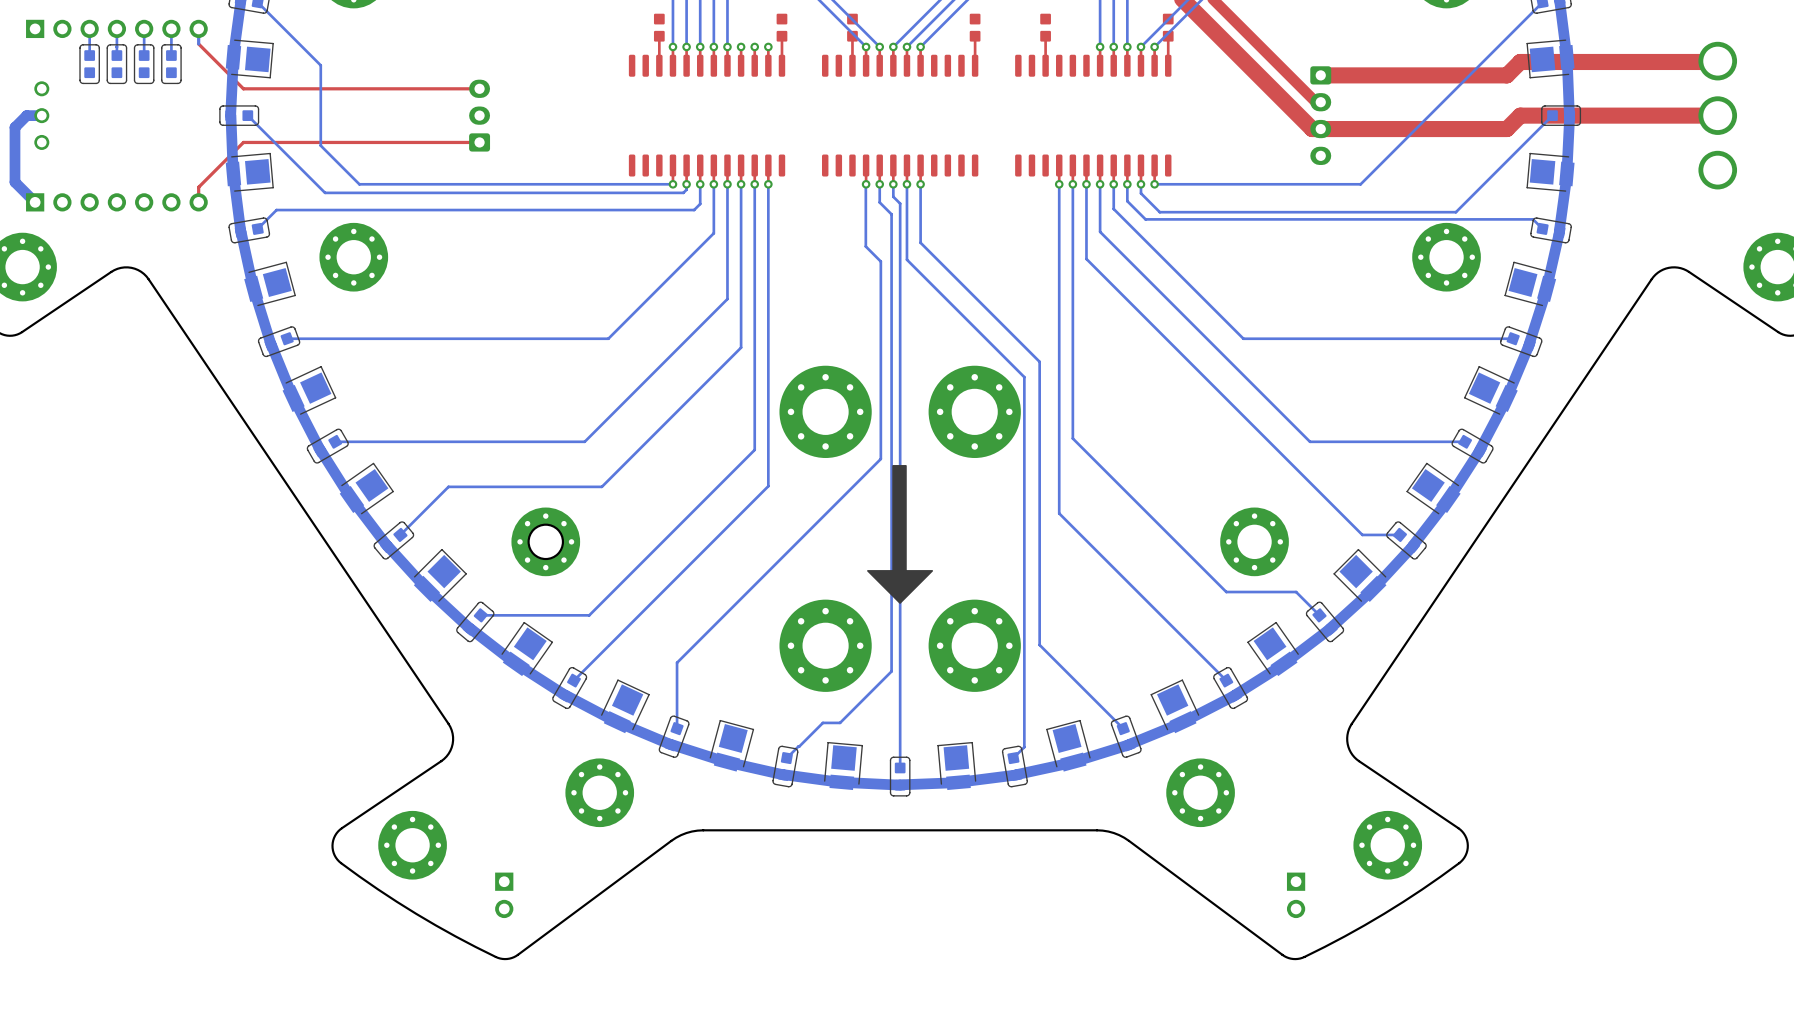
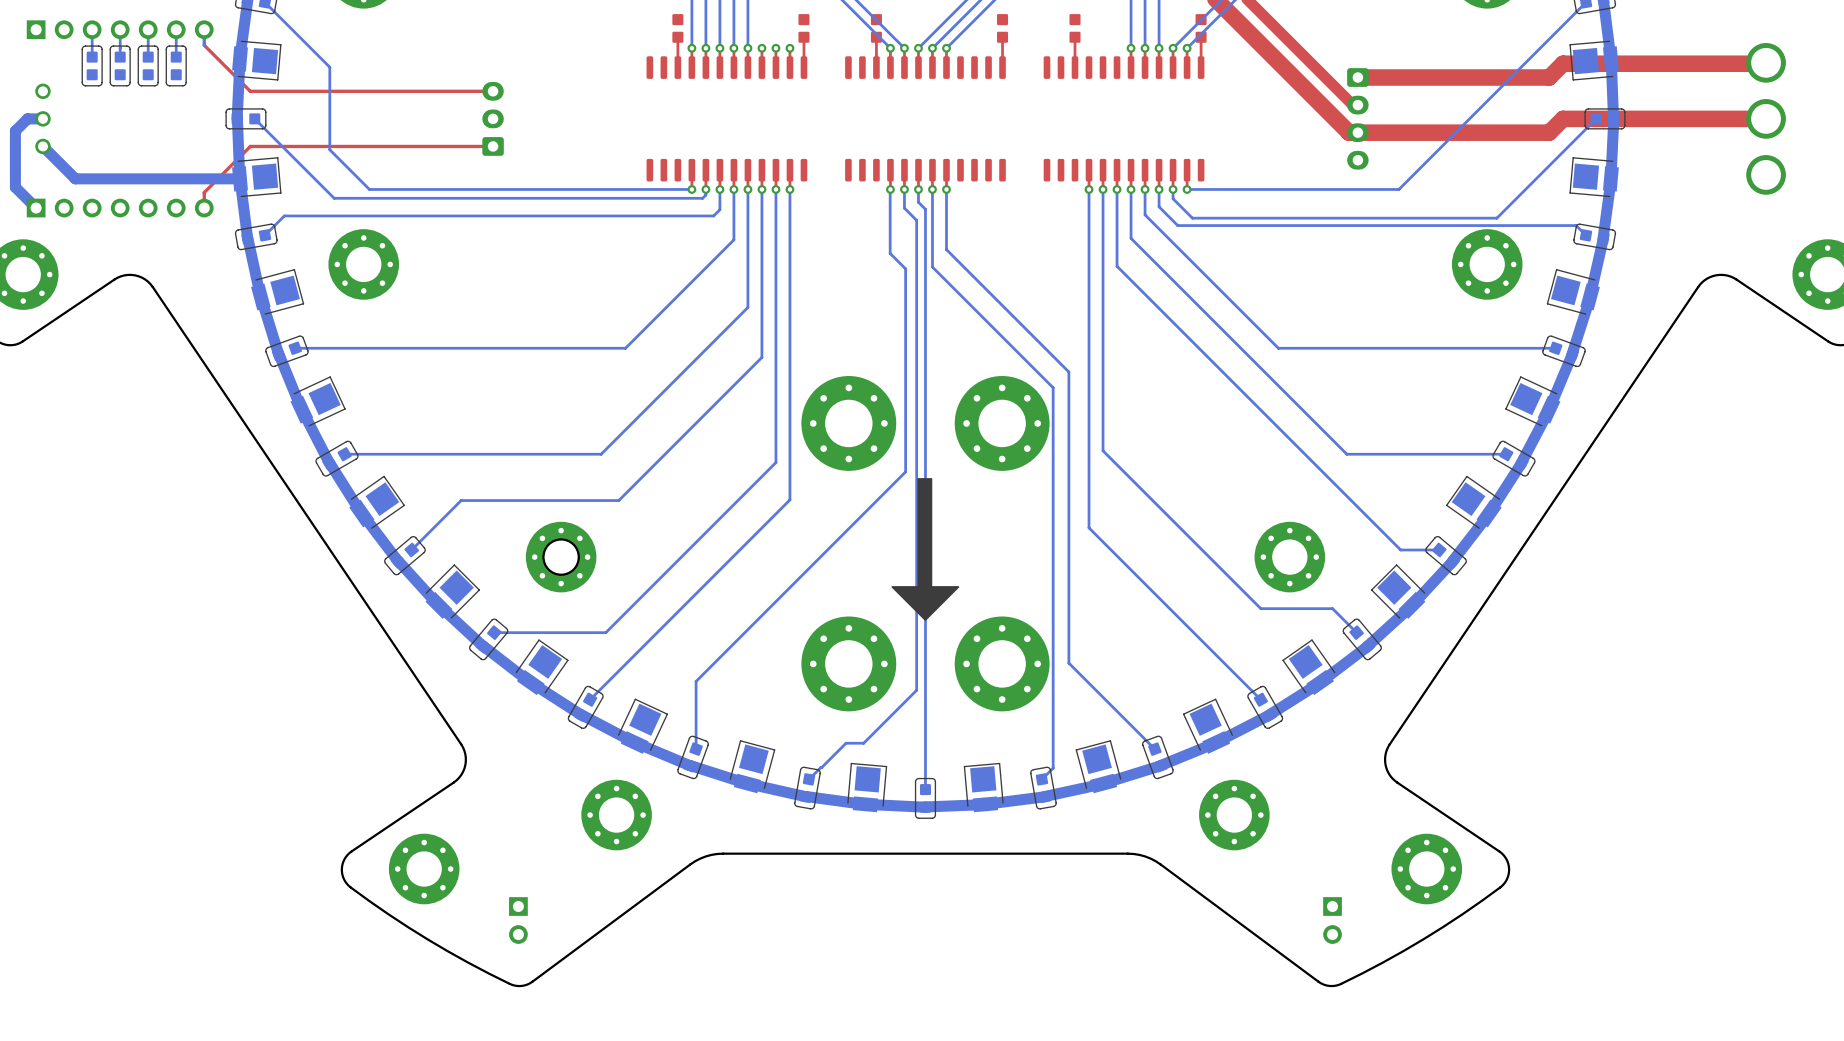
bottom track: none -> (42, 146) (75, 178) (240, 178)

